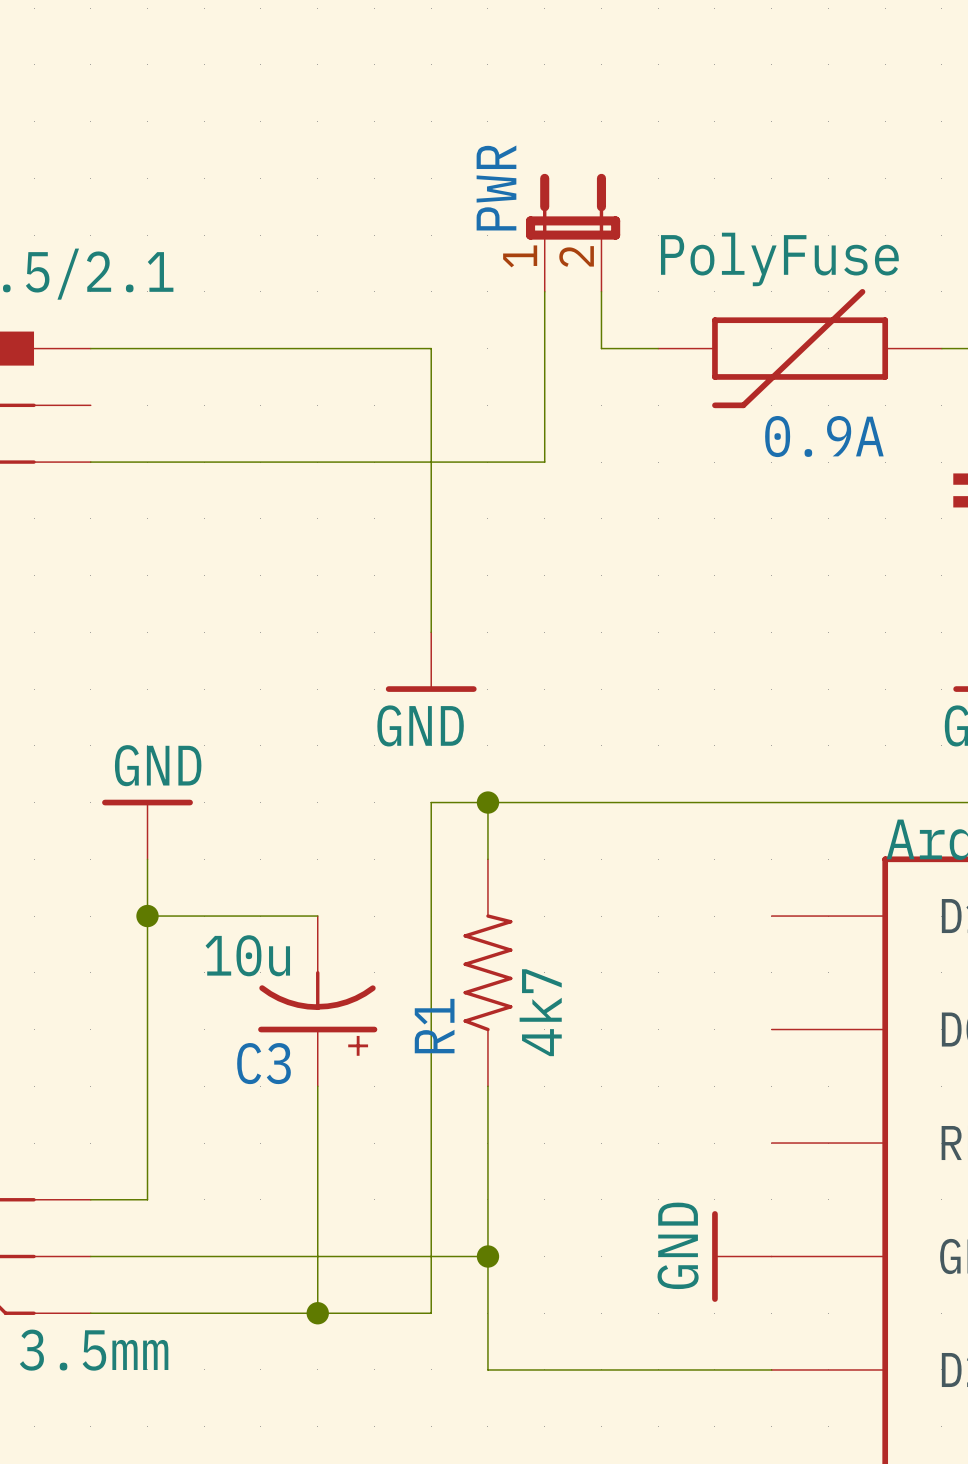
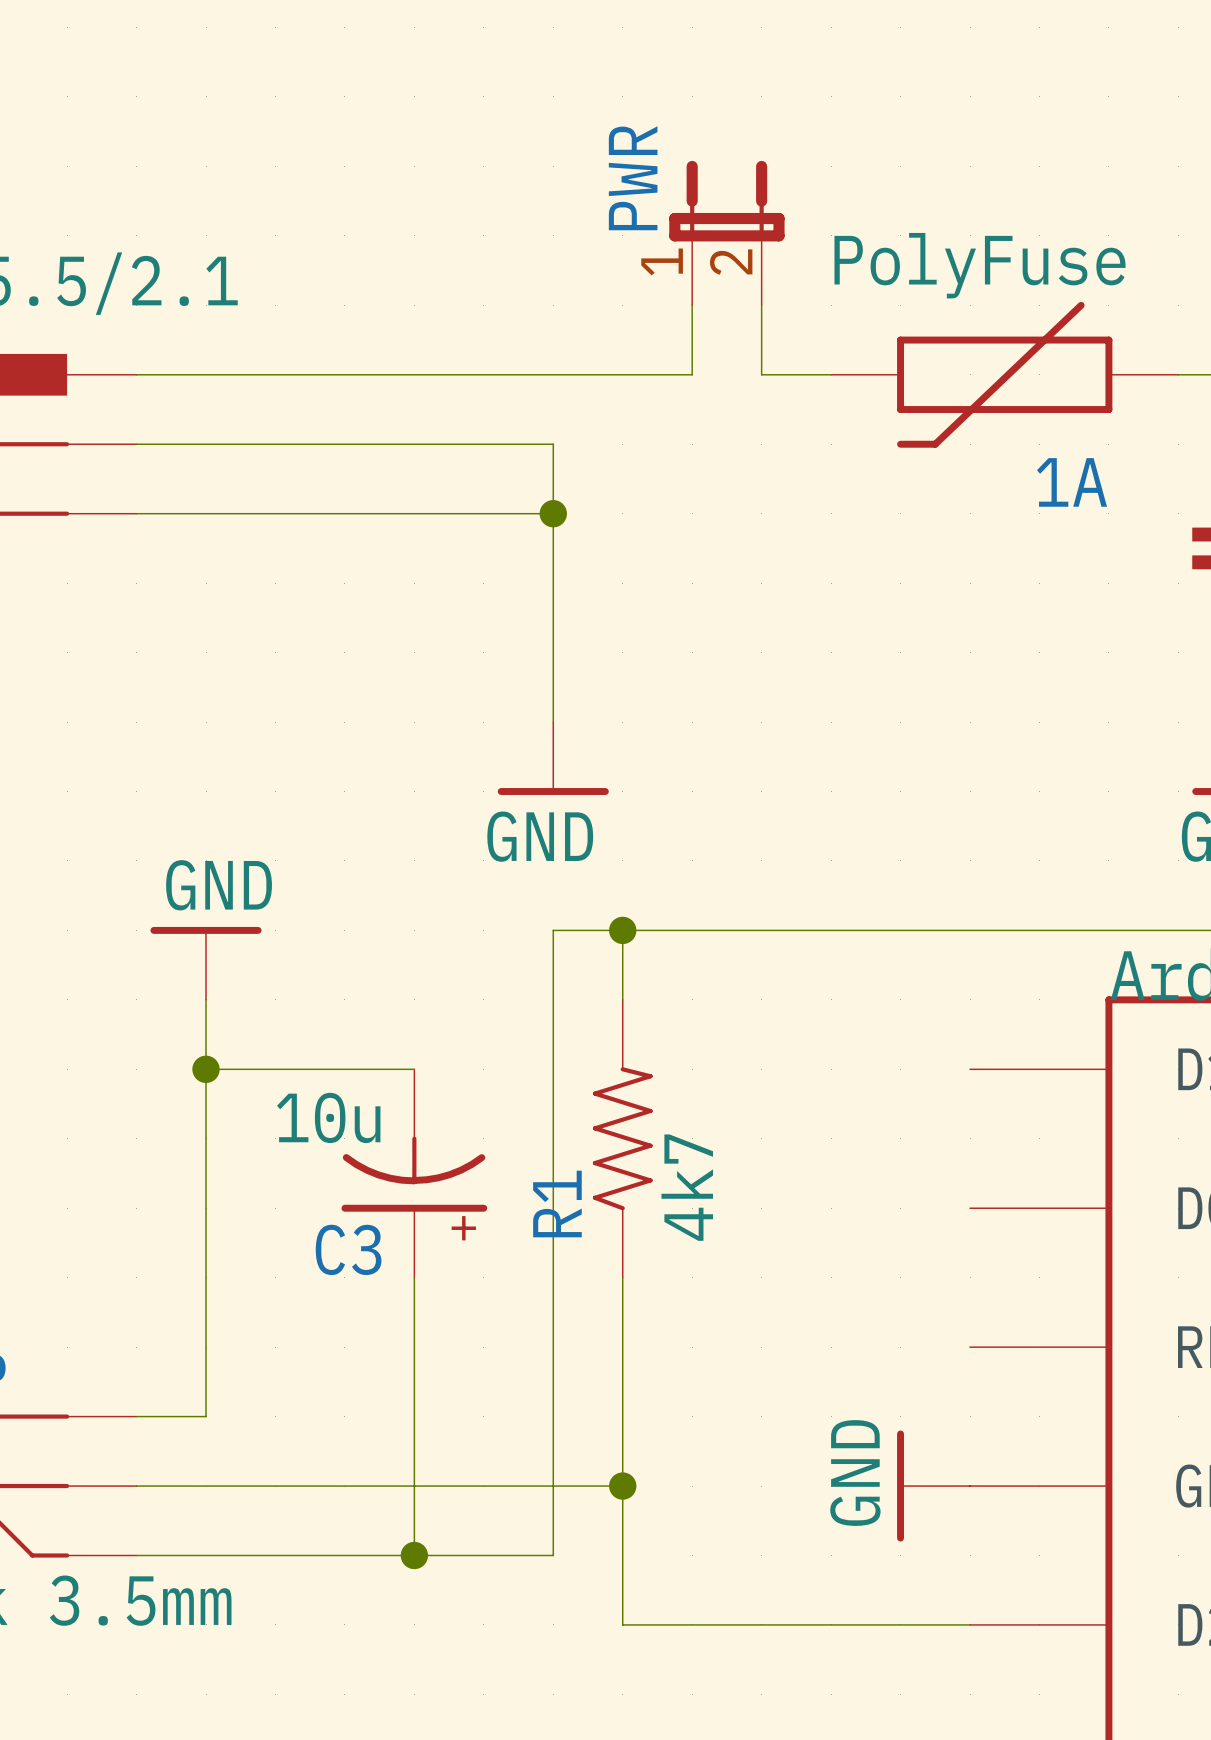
wire: (431, 348) (431, 405) -> (136, 444) (553, 444)
wire: (544, 348) (544, 462) (431, 462) -> (692, 374) (553, 374)
0.9A name: 0.9A (824, 436) -> 1A (1072, 482)
junction: none -> (553, 513)

